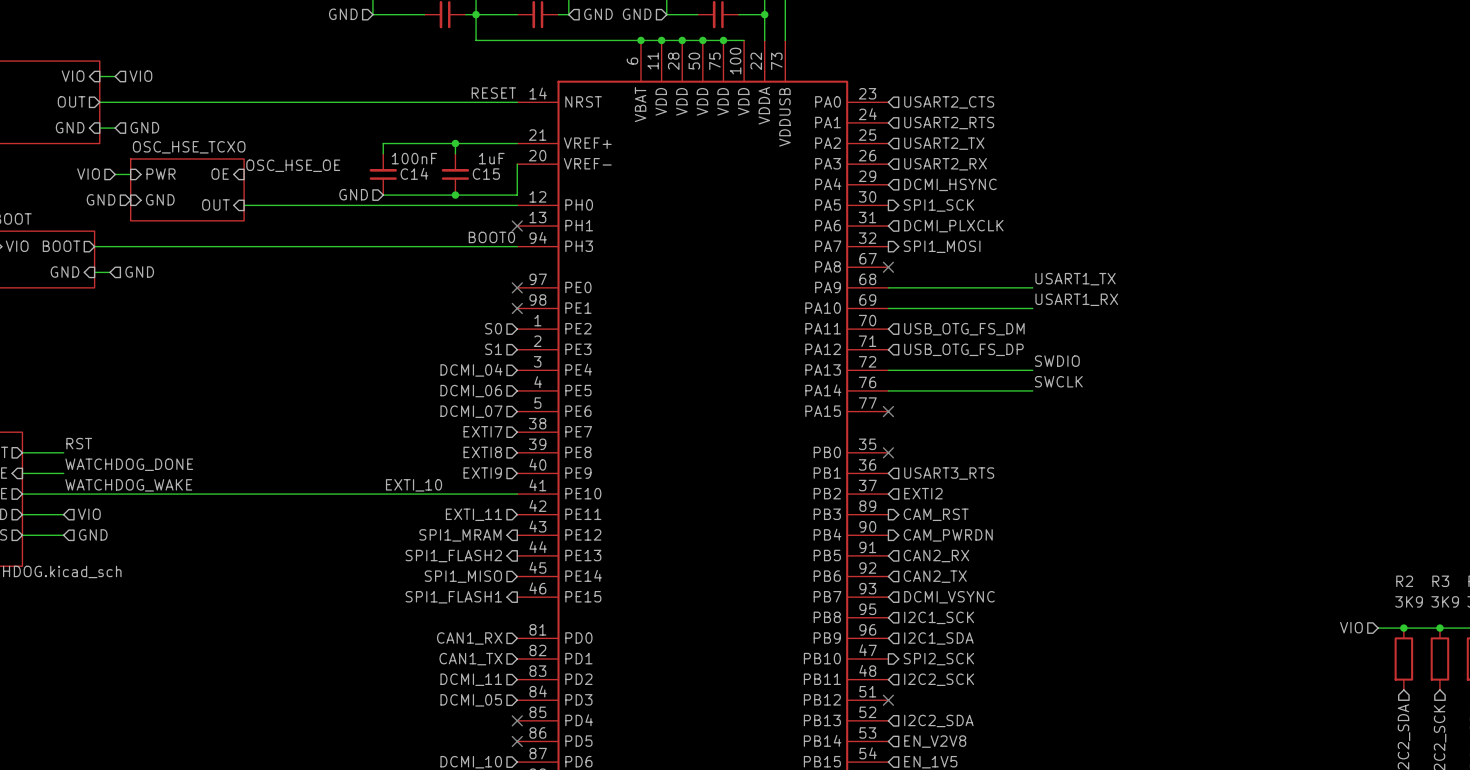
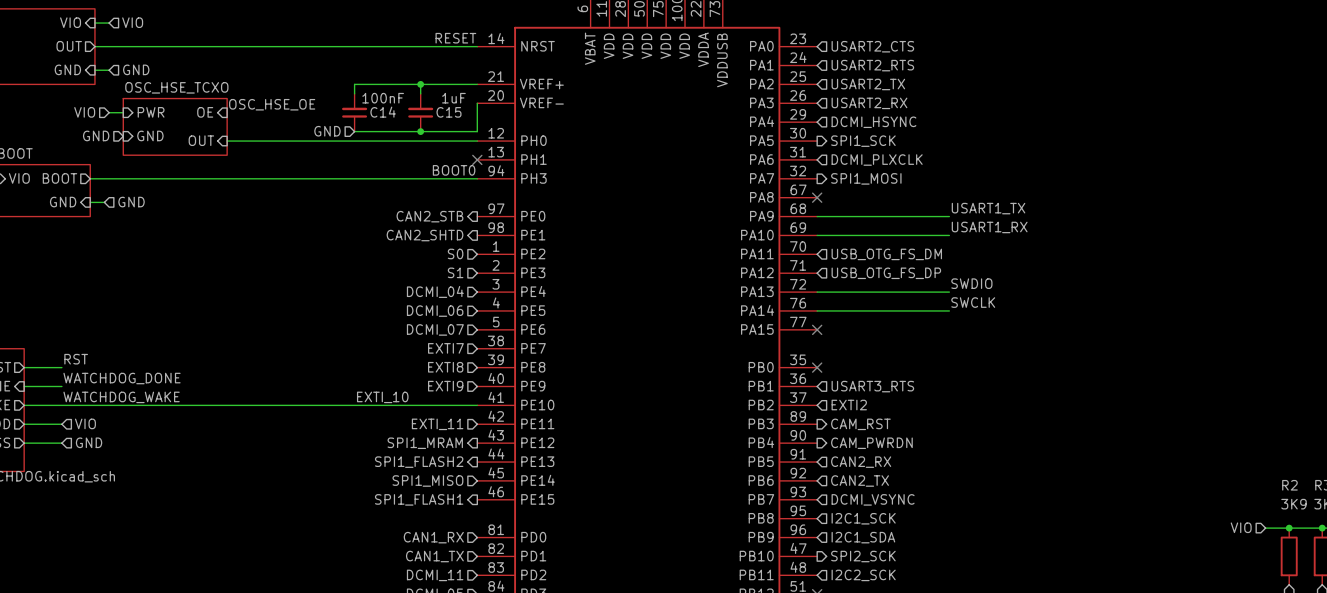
hierarchical label: none -> CAN2_STB (429, 216)
no-connect mark: (517, 287) -> none
hierarchical label: none -> CAN2_SHTD (425, 235)
no-connect mark: (517, 308) -> none

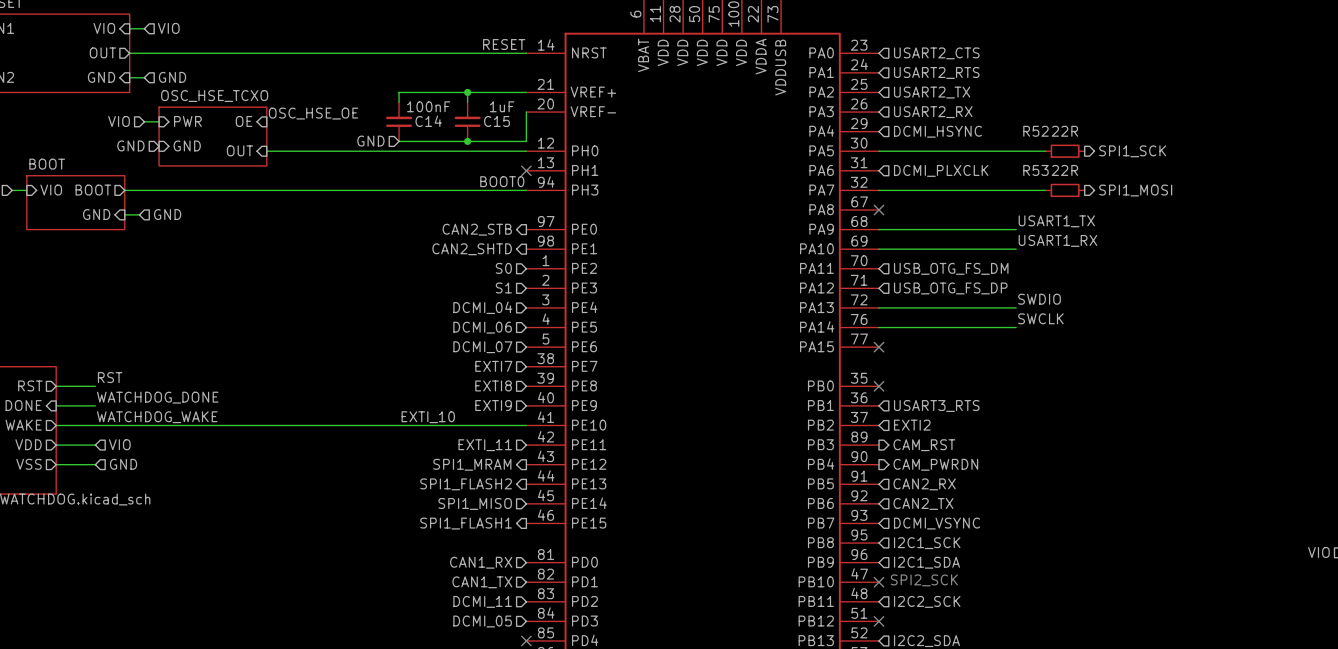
wire: none -> (879, 151) (1045, 151)
hierarchical label: SPI1_SCK (863, 141) -> none
R52: none -> 22R (1065, 151)
hierarchical label: none -> SPI1_SCK (1132, 151)
wire: none -> (879, 190) (1045, 190)
hierarchical label: SPI1_MOSI (866, 178) -> none
R53: none -> 22R (1065, 190)
hierarchical label: none -> SPI1_MOSI (1135, 190)
text: none -> SPI2_SCK (924, 580)
no-connect mark: none -> (879, 582)
hierarchical label: SPI2_SCK (863, 556) -> none

